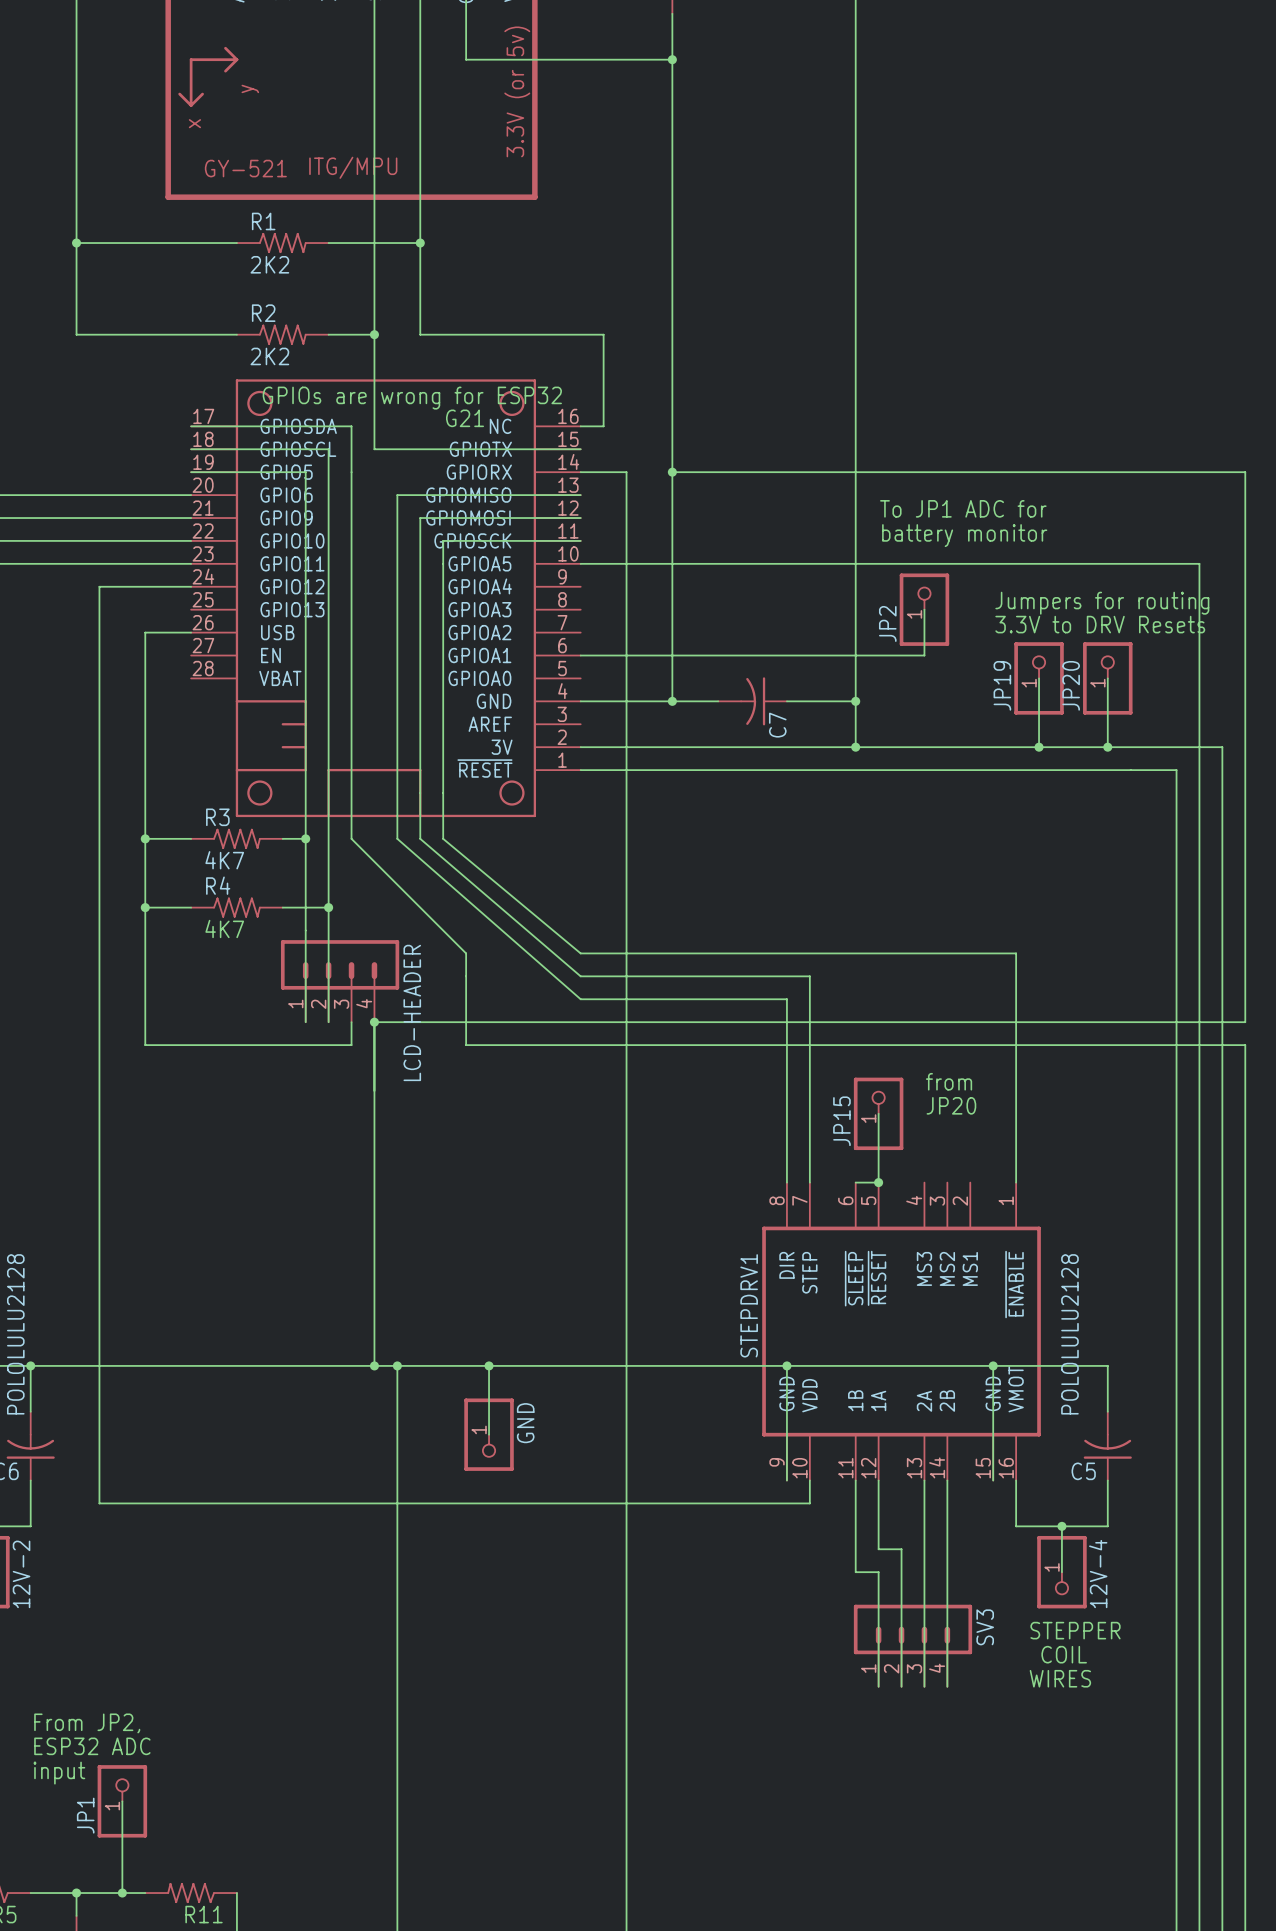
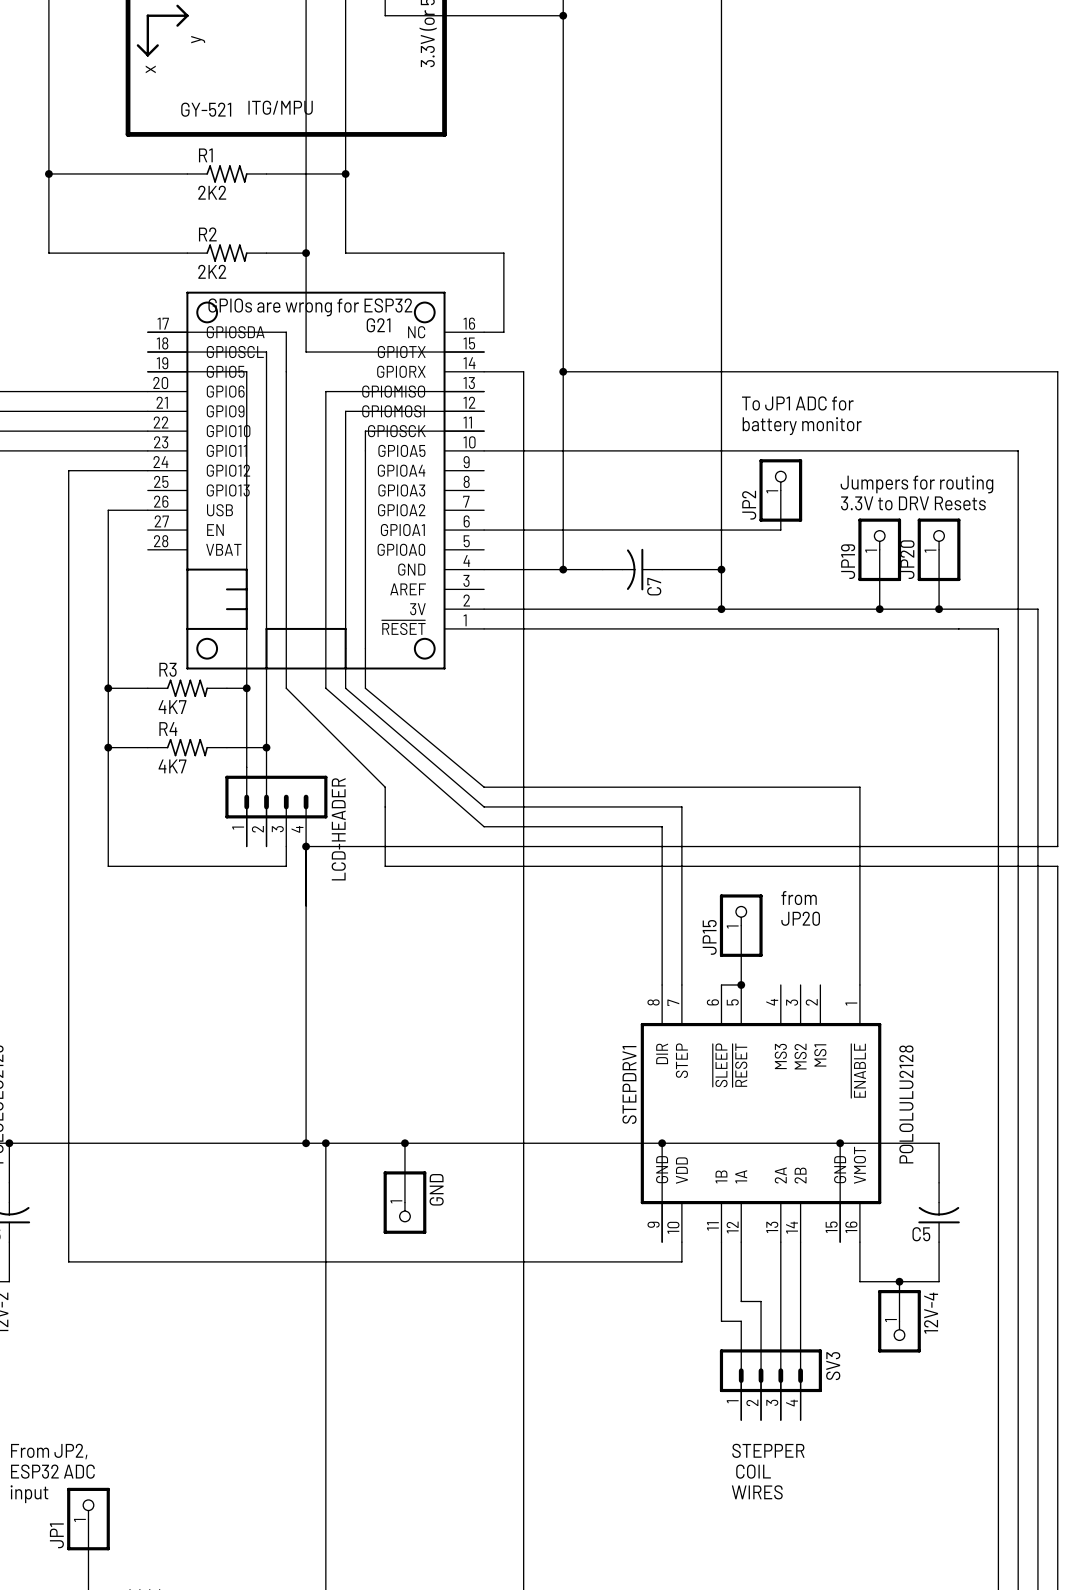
text position: STEPPER (1075, 1630) -> STEPPER (768, 1450)
text position: COIL (1064, 1654) -> COIL (753, 1471)
text position: WIRES (1060, 1678) -> WIRES (757, 1492)

